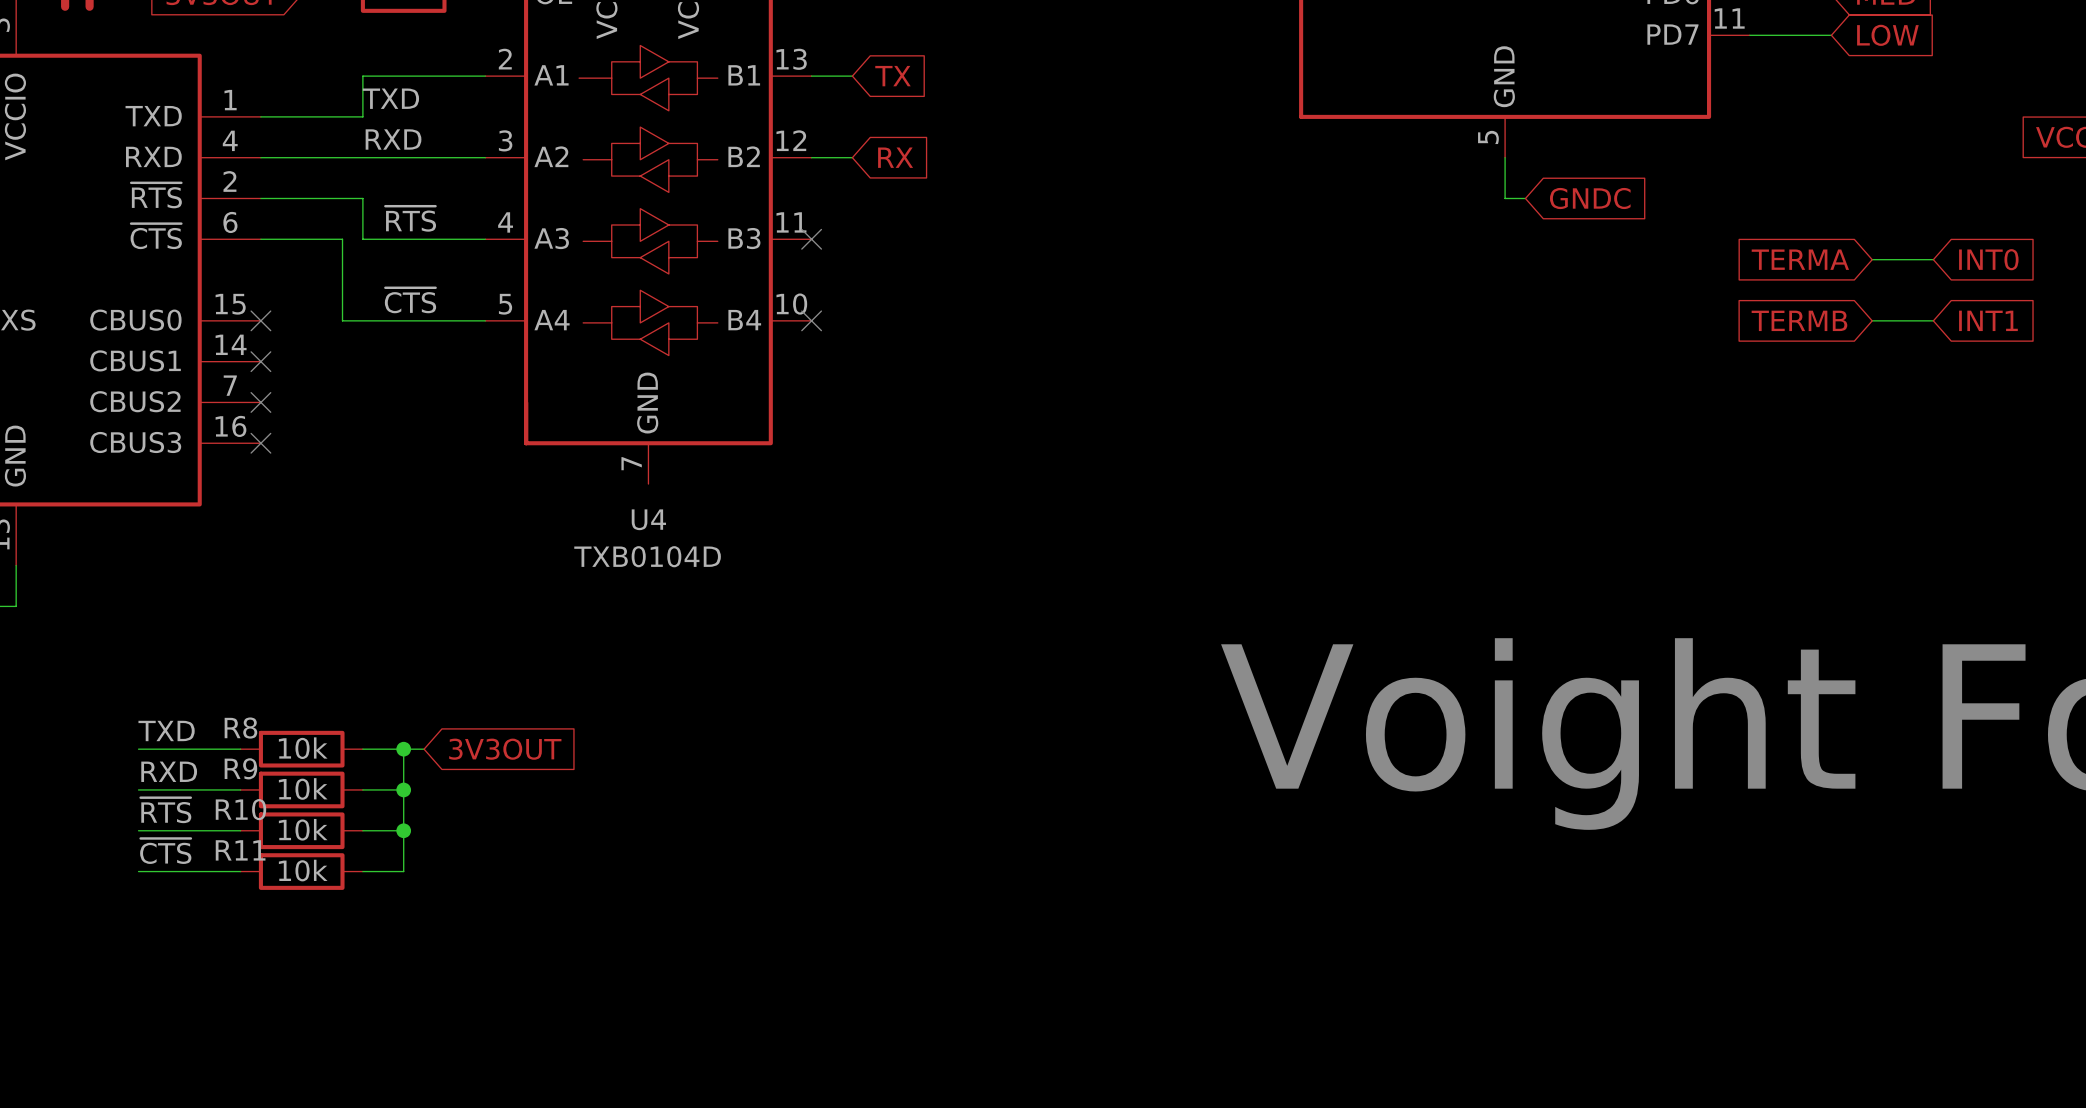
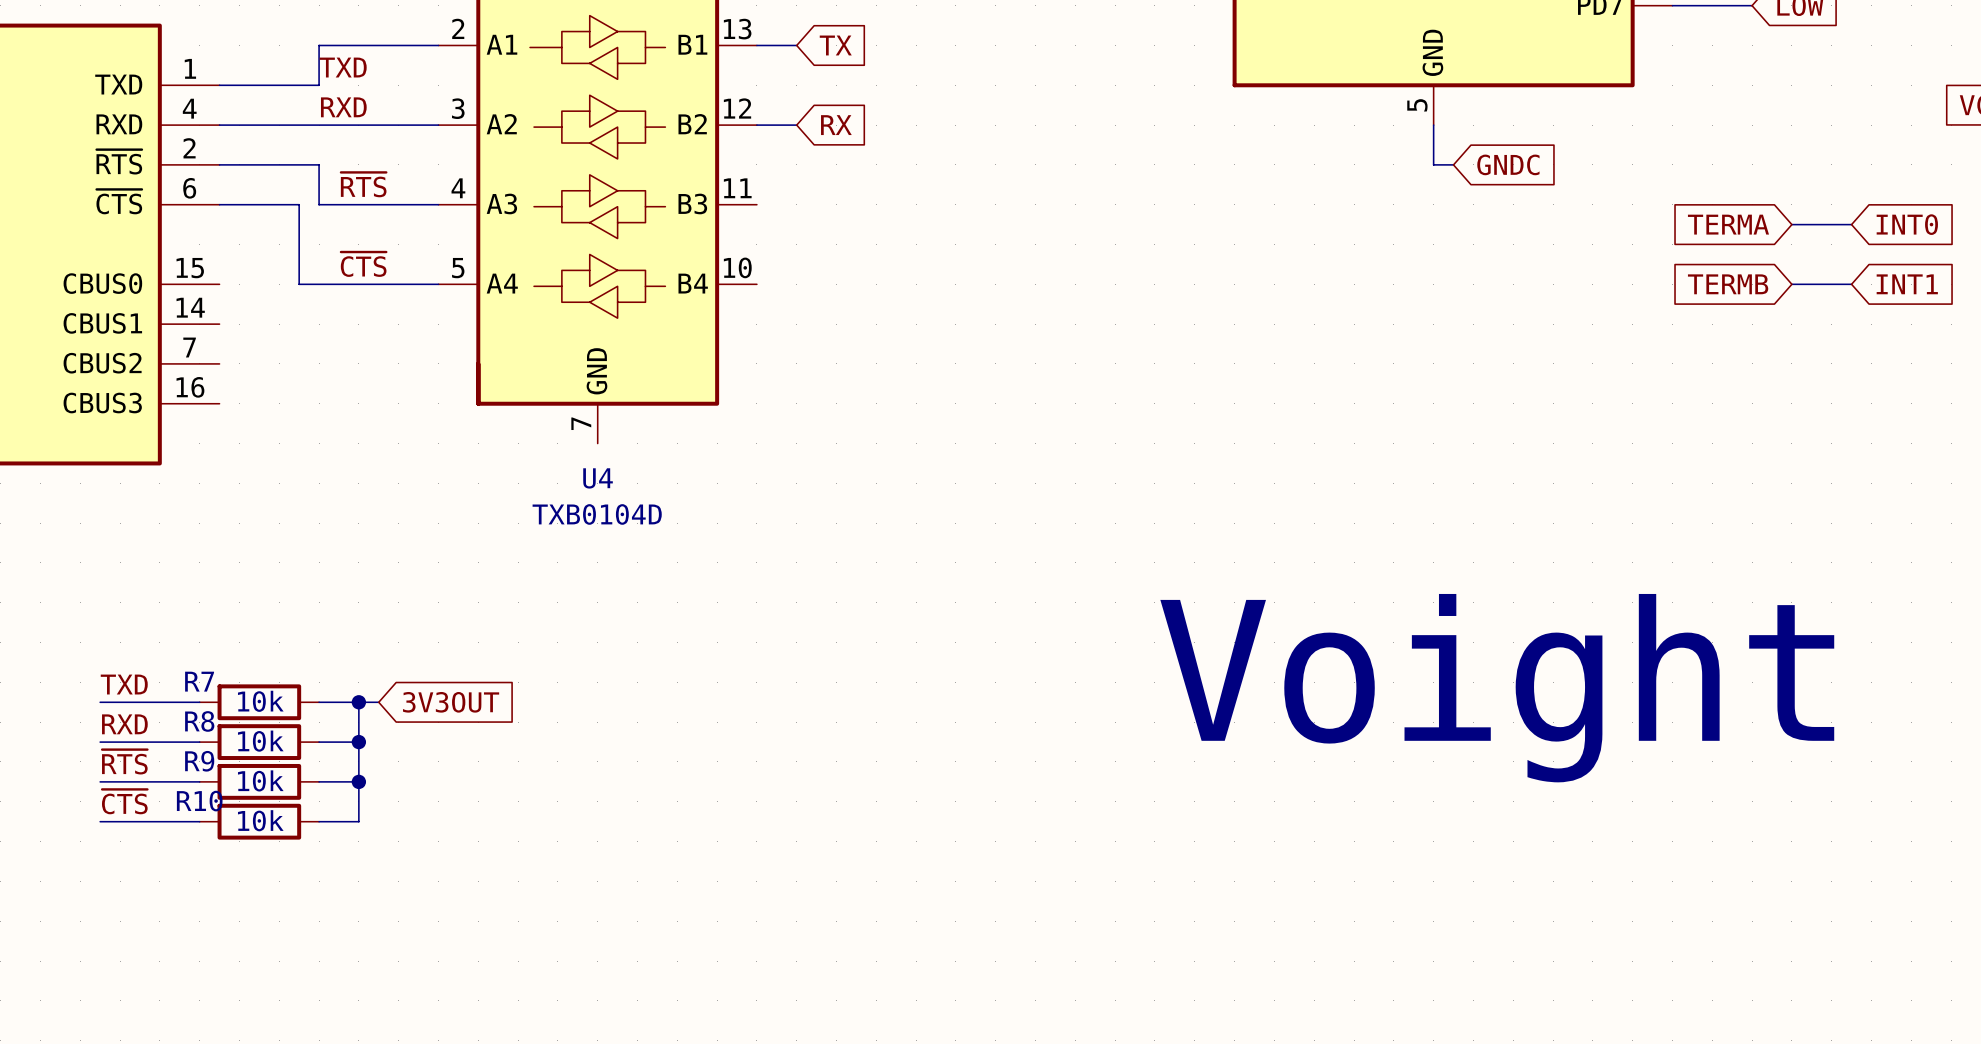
no-connect mark: (811, 239) -> none
no-connect mark: (260, 320) -> none
no-connect mark: (811, 320) -> none
no-connect mark: (260, 361) -> none
no-connect mark: (260, 402) -> none
no-connect mark: (260, 443) -> none
R8 name: R8 (240, 728) -> R7 (199, 681)
R9 name: R9 (240, 768) -> R8 (199, 721)
R10 name: R10 (240, 809) -> R9 (199, 761)
R11 name: R11 (240, 850) -> R10 (199, 801)

